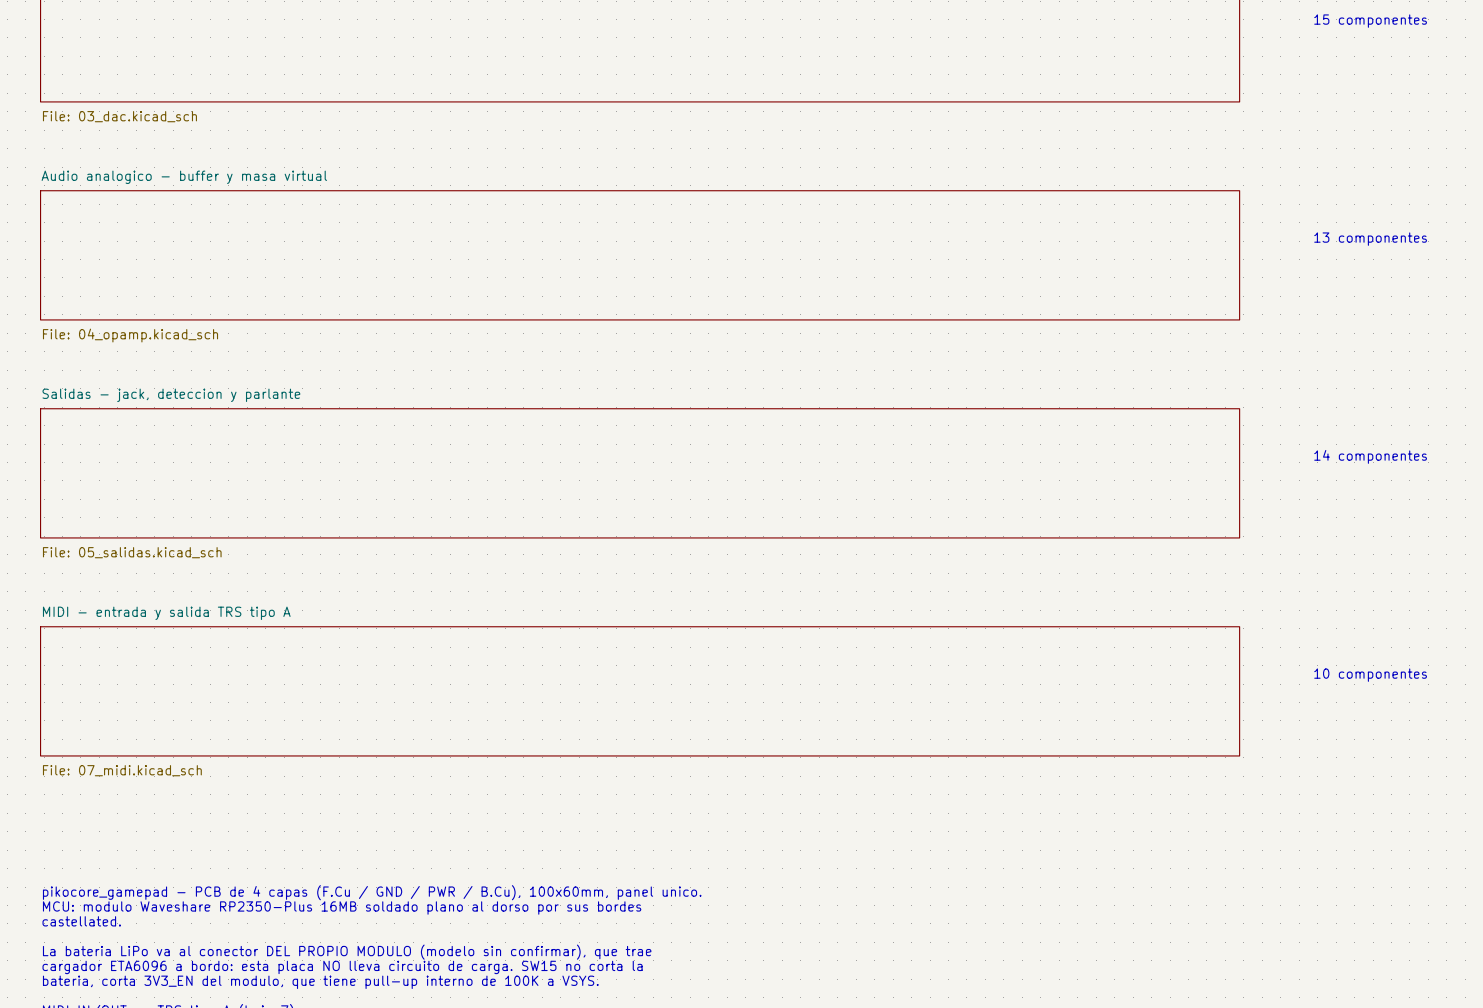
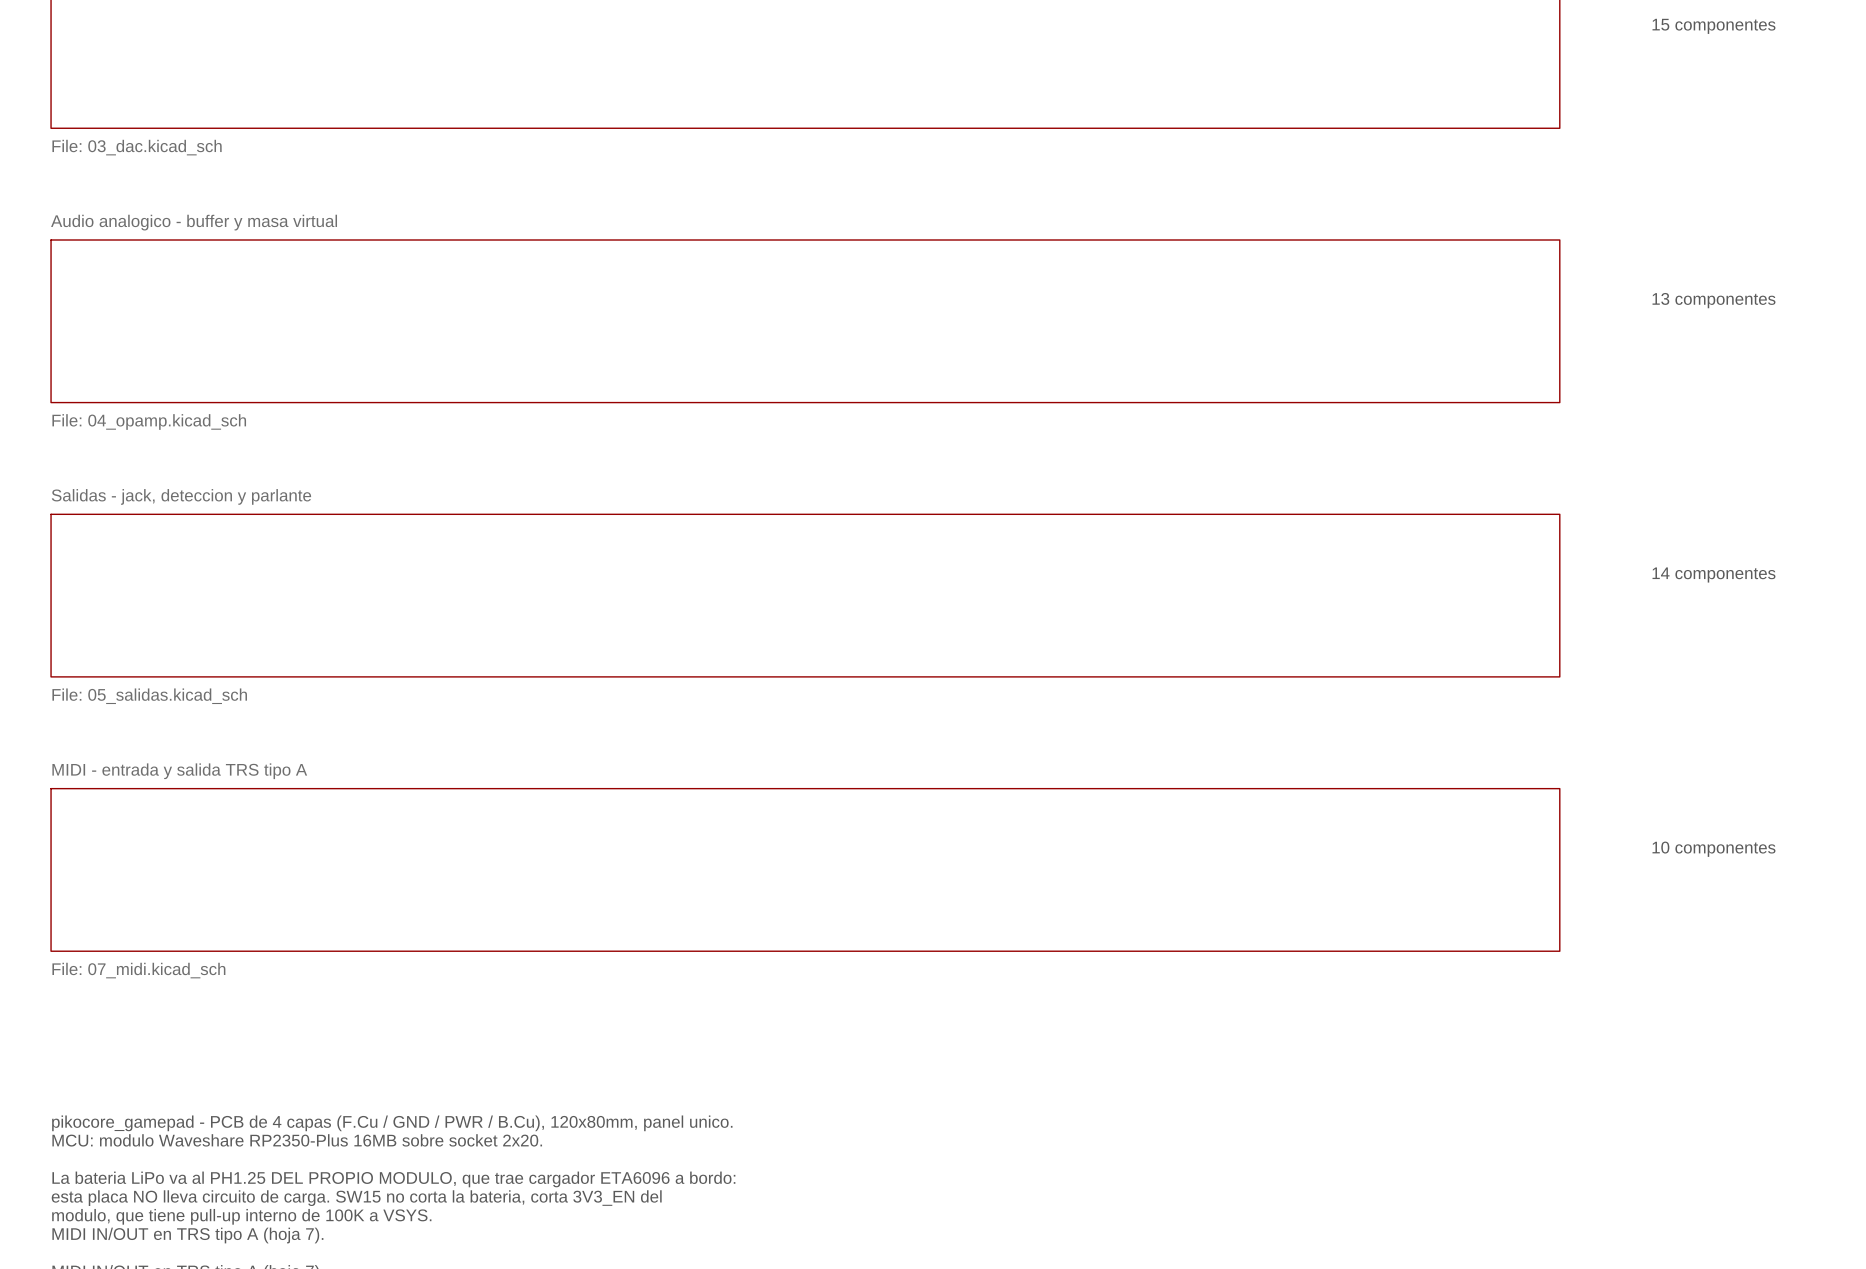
text: pikocore_gamepad - PCB de 4 capas (F.Cu / GND / PWR / B.Cu), 100x60mm, panel unico. (372, 892) -> pikocore_gamepad - PCB de 4 capas (F.Cu / GND / PWR / B.Cu), 120x80mm, panel unico. (392, 1123)
text: MCU: modulo Waveshare RP2350-Plus 16MB soldado plano al dorso por sus bordes (342, 908) -> MCU: modulo Waveshare RP2350-Plus 16MB sobre socket 2x20. (297, 1140)
text: castellated. (81, 921) -> none
text: none -> La bateria LiPo va al PH1.25 DEL PROPIO MODULO, que trae cargador ETA6096 a bordo: (393, 1179)
text: La bateria LiPo va al conector DEL PROPIO MODULO (modelo sin confirmar), que trae (347, 952) -> esta placa NO lleva circuito de carga. SW15 no corta la bateria, corta 3V3_EN del (356, 1198)
text: cargador ETA6096 a bordo: esta placa NO lleva circuito de carga. SW15 no corta la (342, 967) -> modulo, que tiene pull-up interno de 100K a VSYS. (241, 1216)
text: bateria, corta 3V3_EN del modulo, que tiene pull-up interno de 100K a VSYS. (320, 982) -> MIDI IN/OUT en TRS tipo A (hoja 7). (187, 1235)

